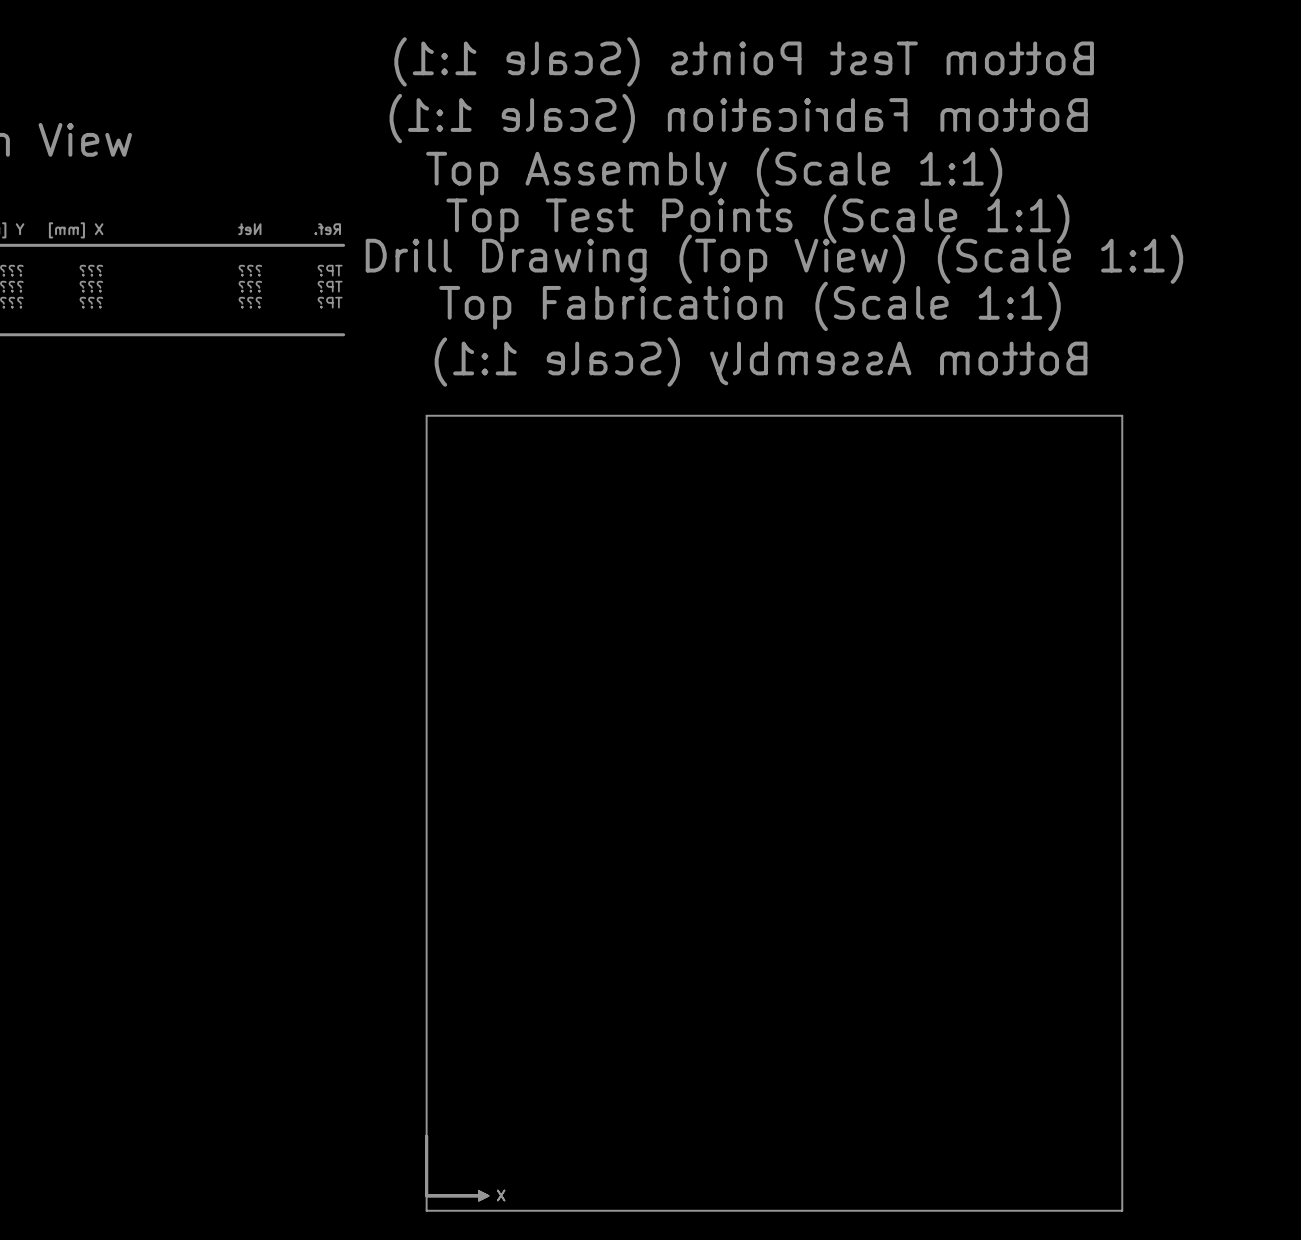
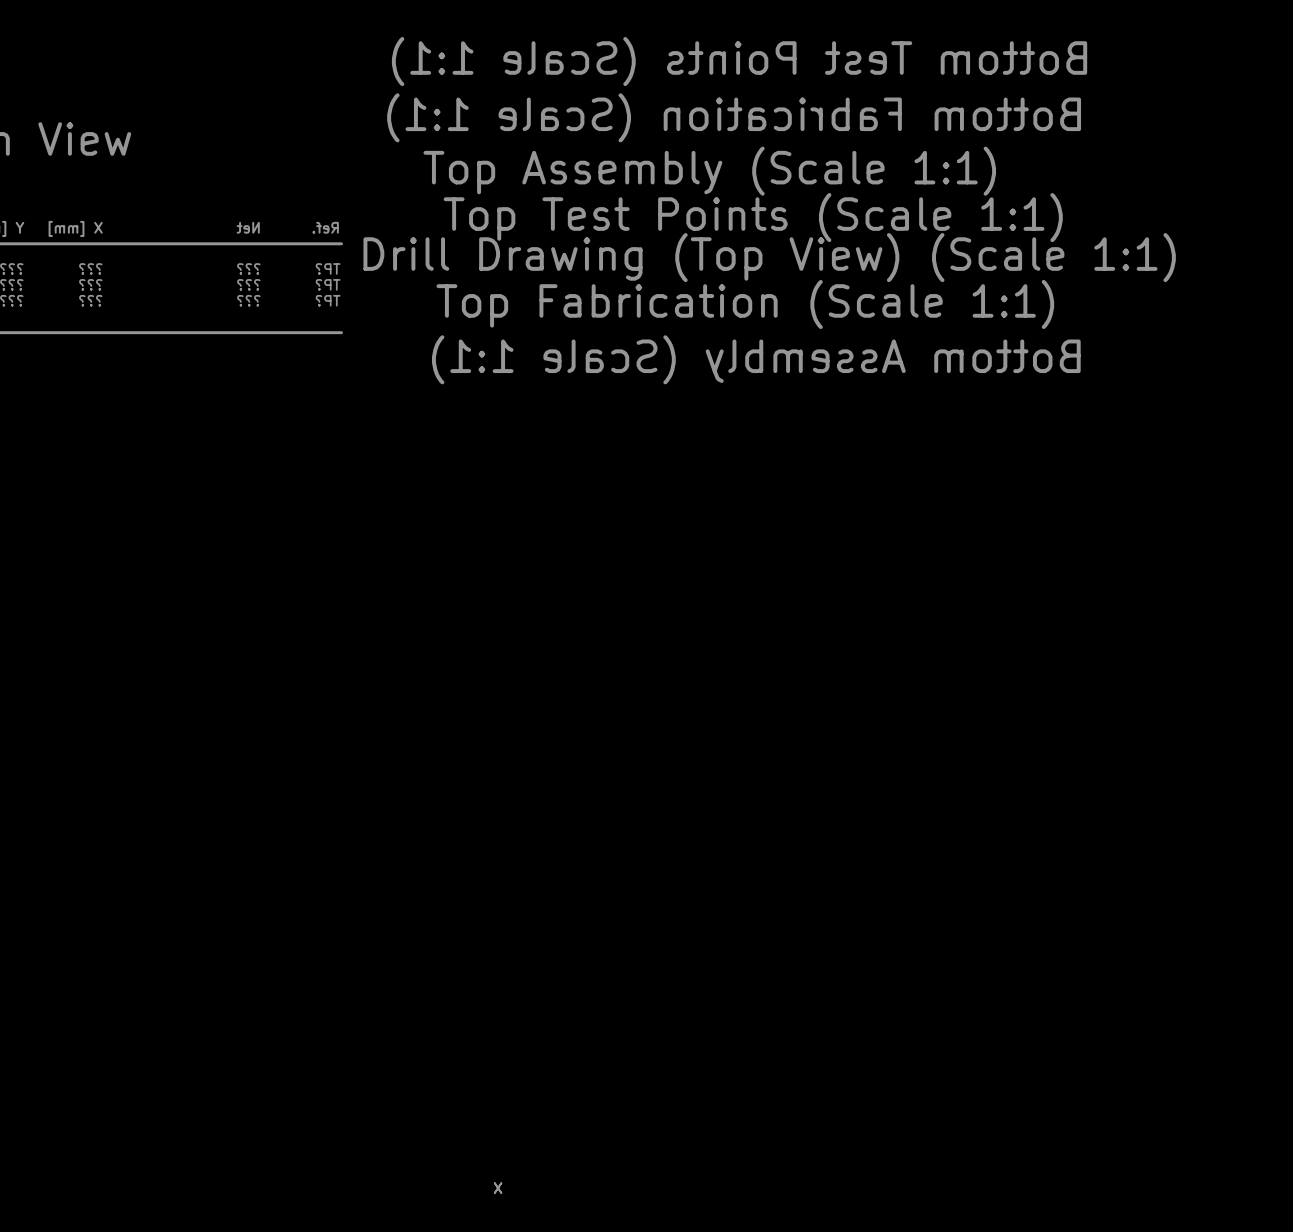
line: (426, 415) (1122, 415) (1122, 1210) (426, 1210) (426, 415) -> none
line: (426, 1136) (426, 1195) (486, 1195) -> none
drawing: [478, 1190, 490, 1202] -> none

